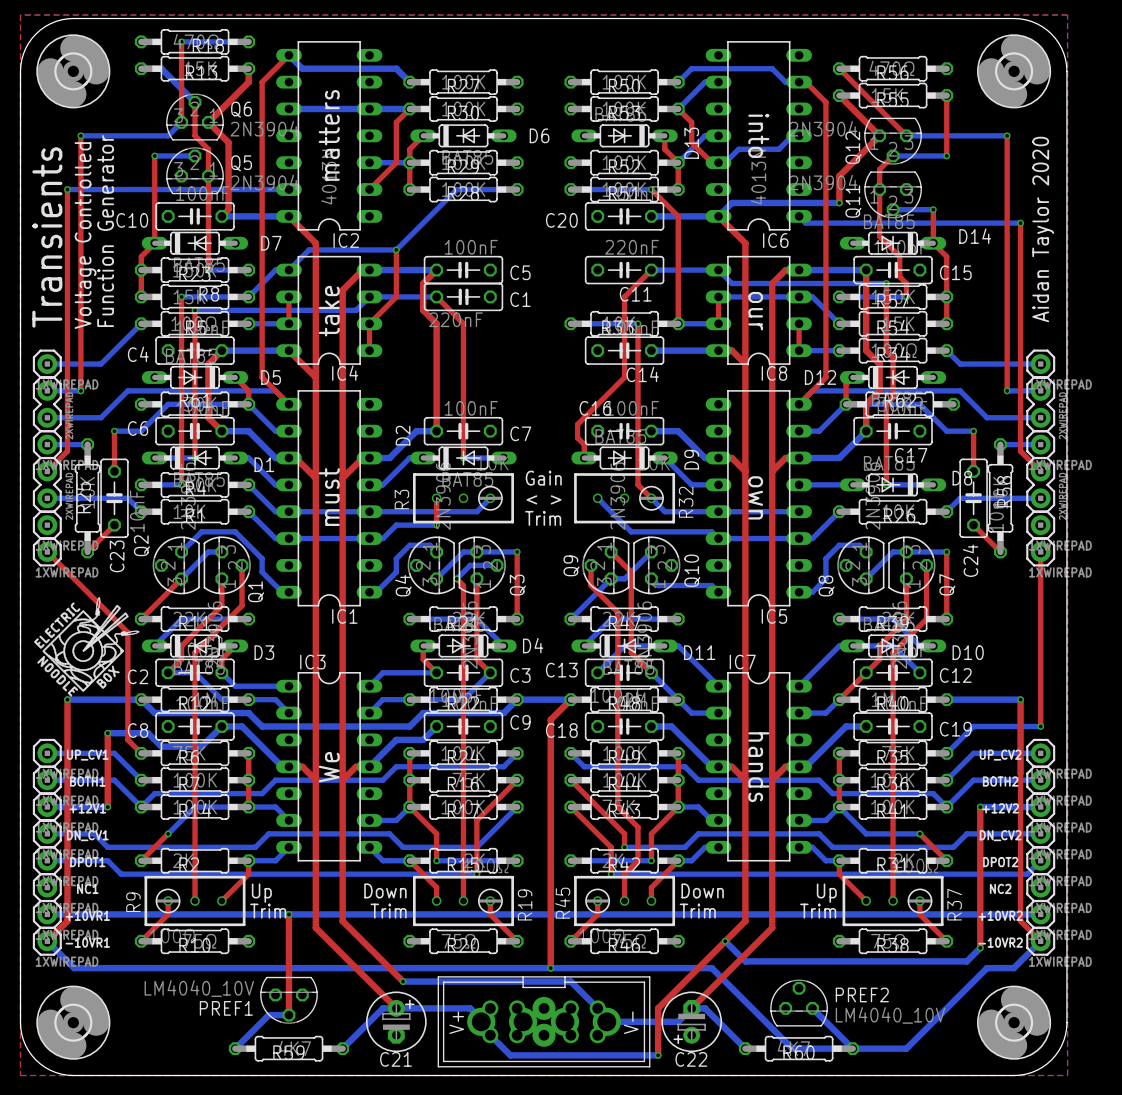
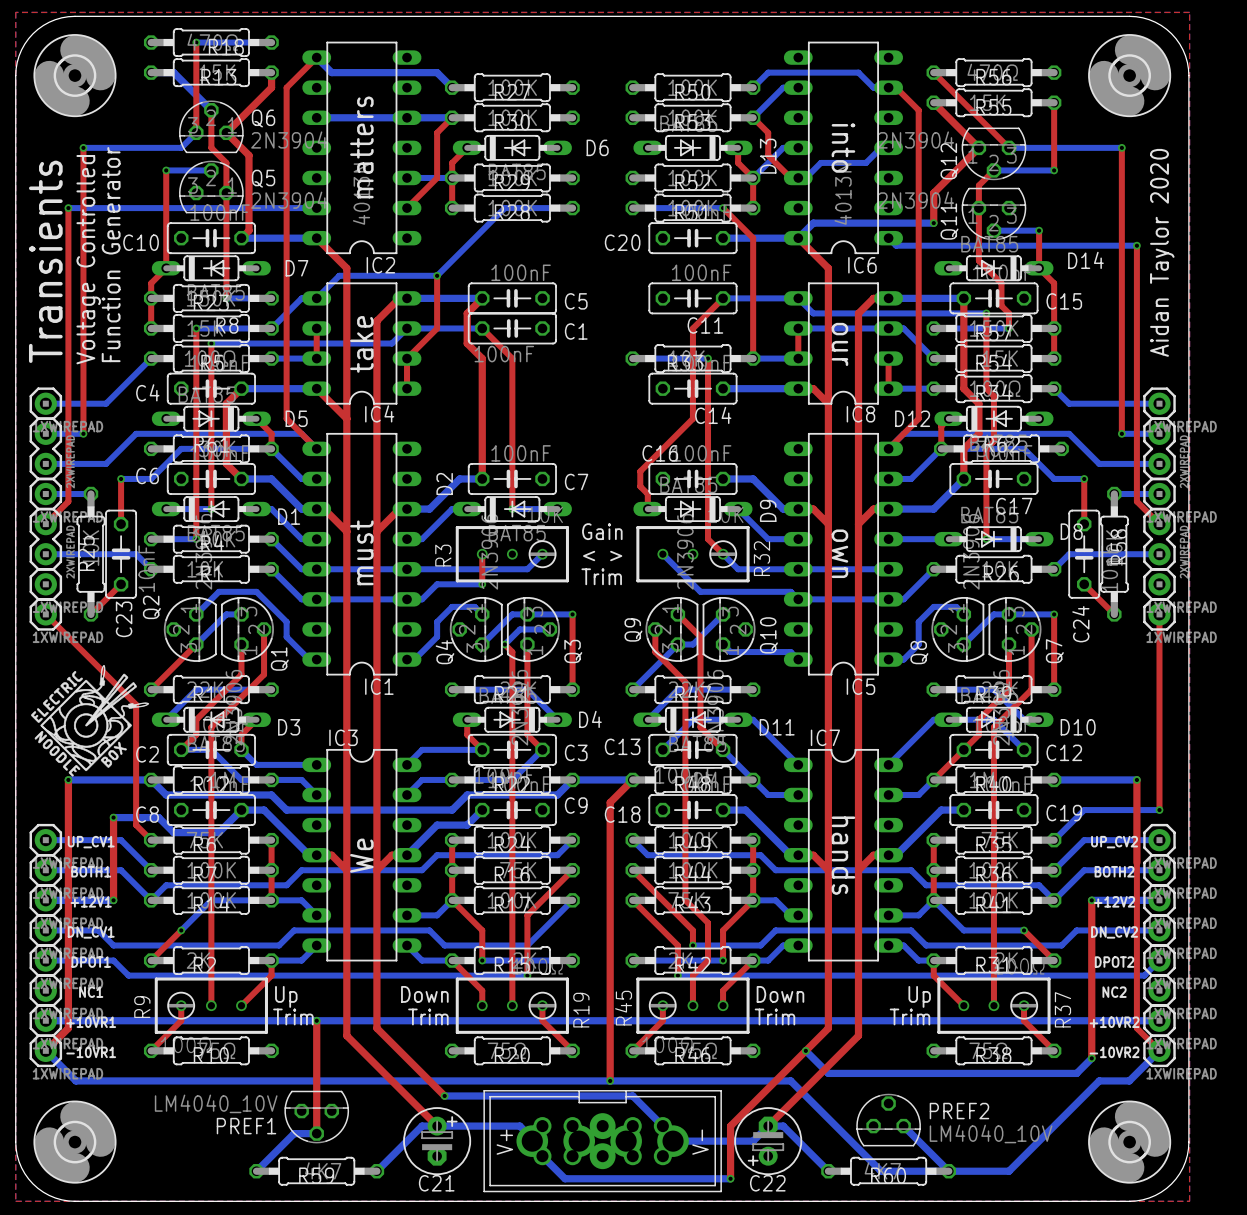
C11 value: 220nF (632, 247) -> 100nF (701, 272)
C1 value: 220nF (456, 319) -> 100nF (504, 354)

